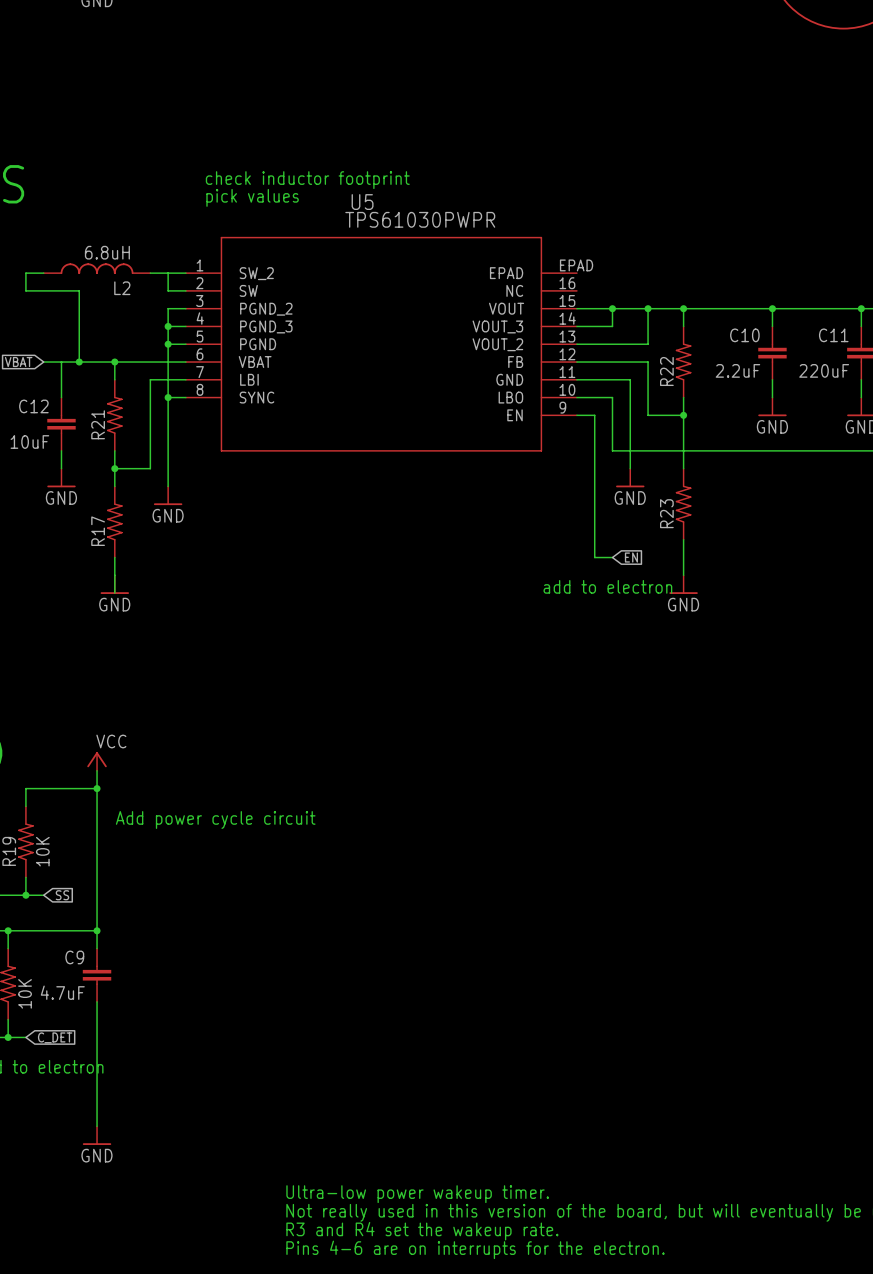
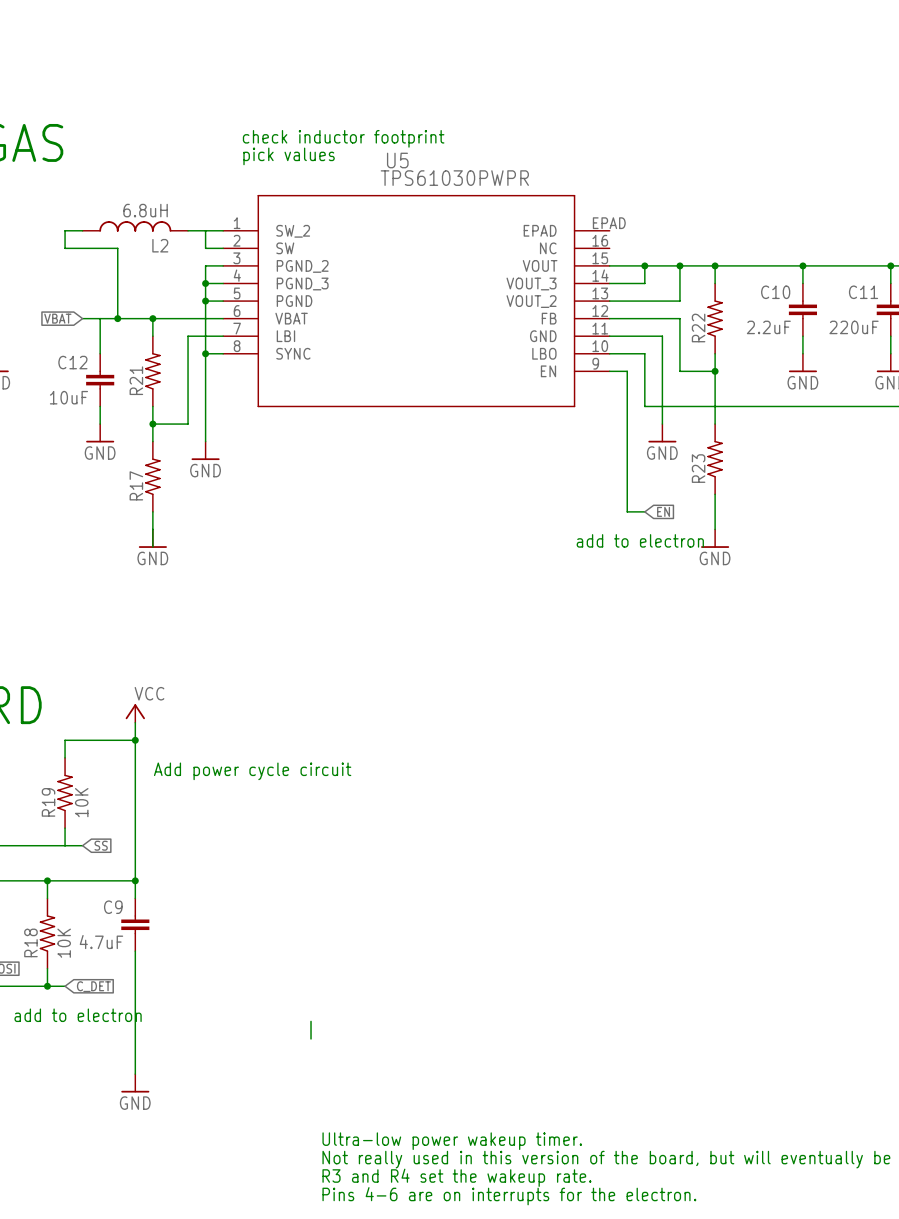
junction: (25, 895) -> none
wire: none -> (311, 1021) (311, 1038)

